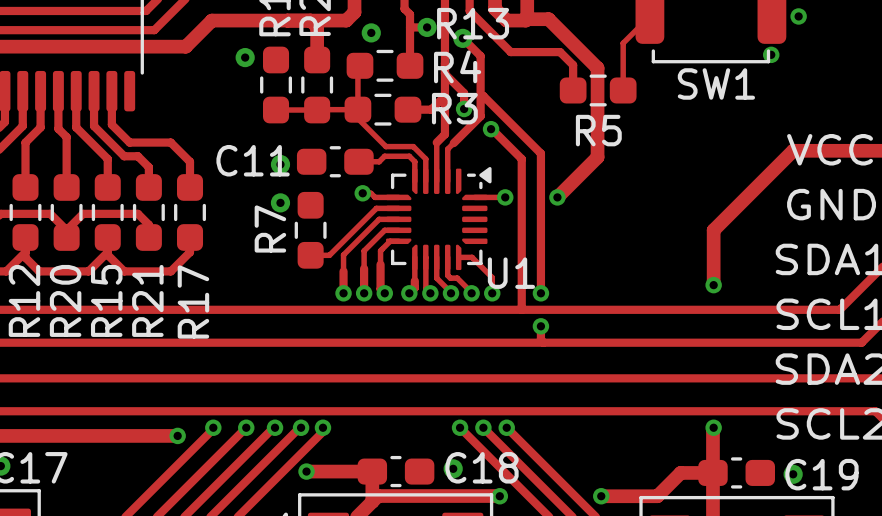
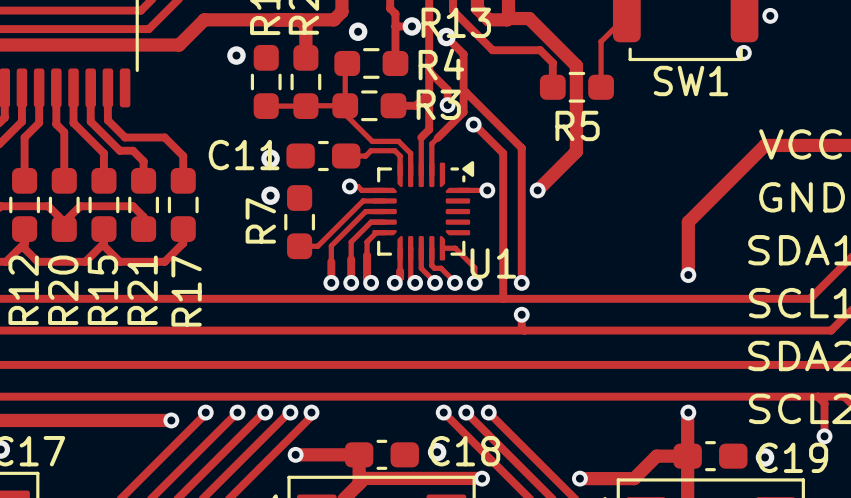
track: none -> (817, 396) (824, 403) (824, 436)
via: none -> (824, 436)

